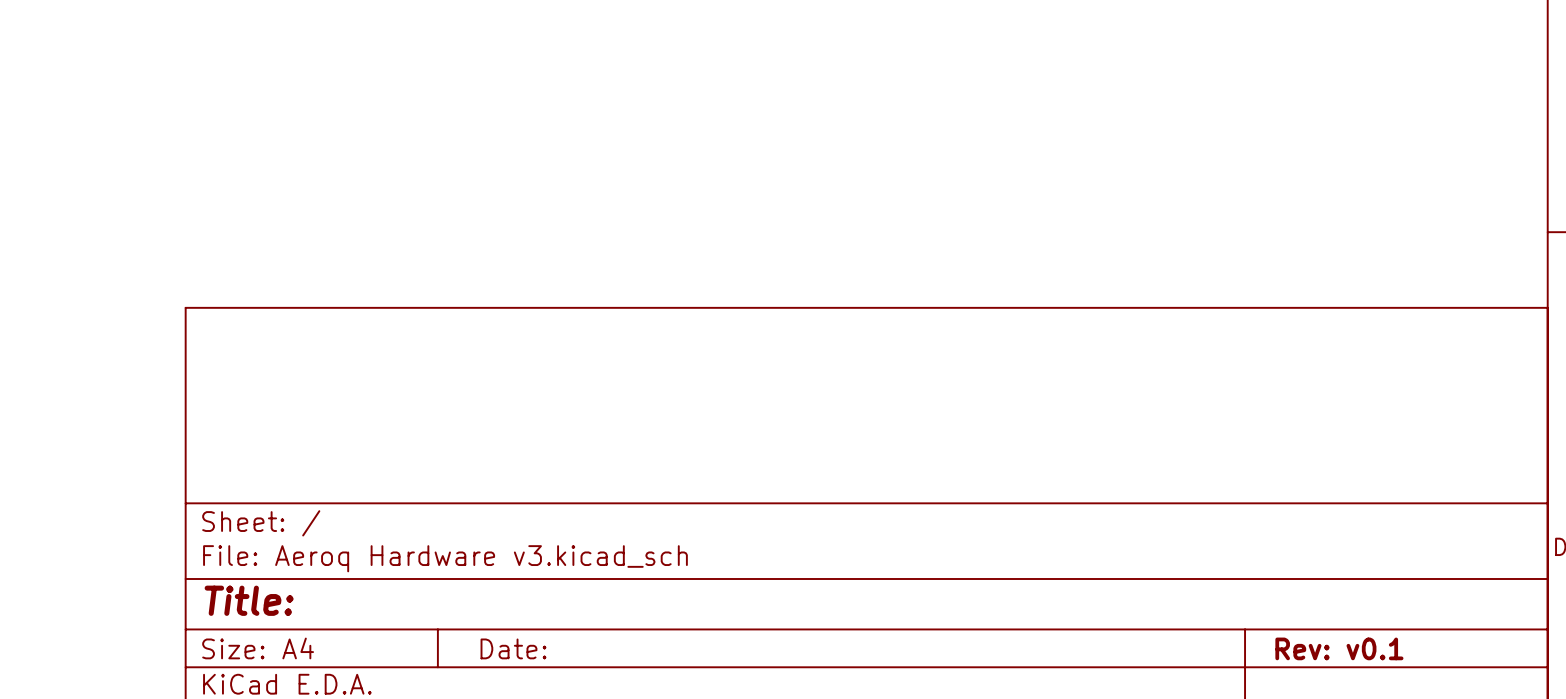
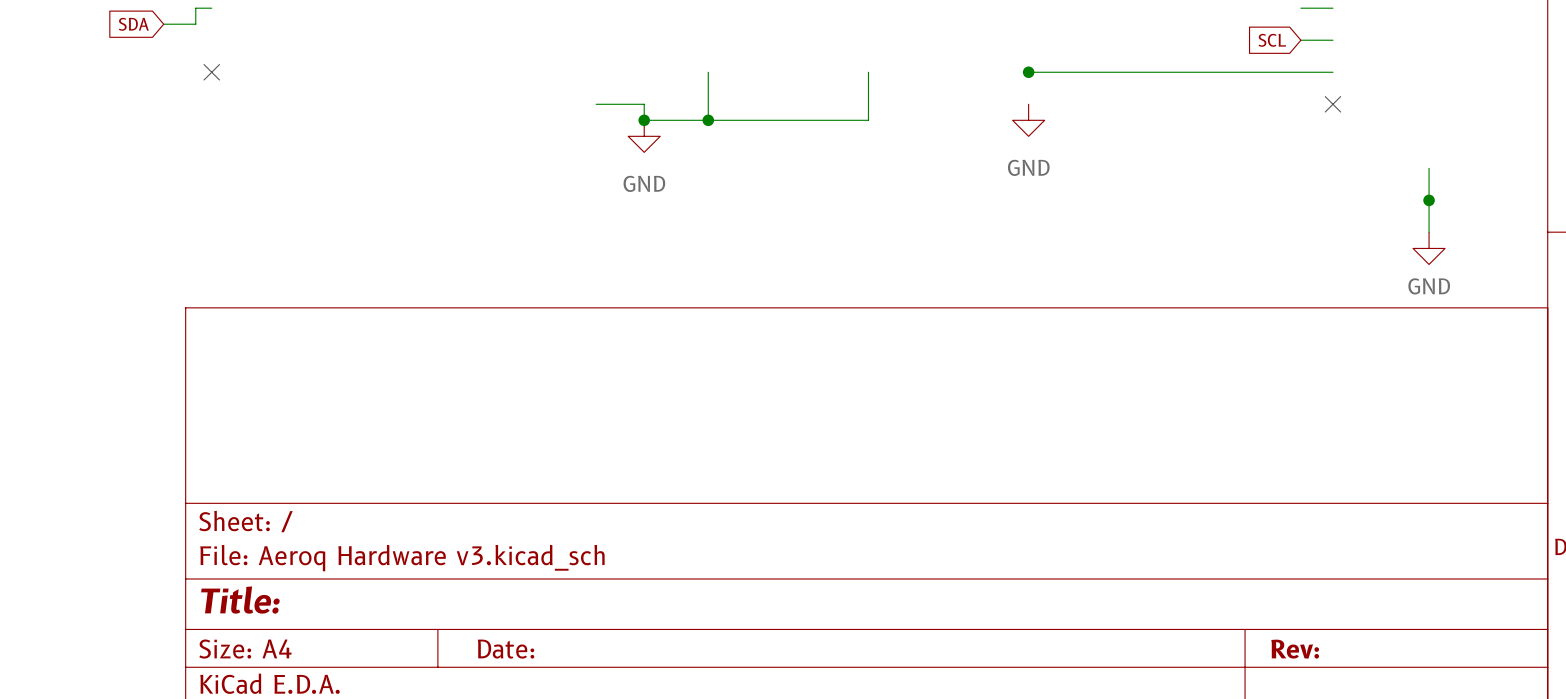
wire: none -> (211, 8) (195, 8) (195, 24) (163, 24)
wire: none -> (1300, 8) (1332, 8)
global label: none -> SDA (133, 24)
global label: none -> SCL (1272, 40)
wire: none -> (1300, 40) (1332, 40)
no-connect mark: none -> (211, 72)
wire: none -> (708, 72) (708, 120)
wire: none -> (868, 72) (868, 120) (644, 120) (644, 104) (596, 104)
wire: none -> (1028, 72) (1332, 72)
junction: none -> (1028, 72)
no-connect mark: none -> (1332, 104)
junction: none -> (644, 120)
junction: none -> (708, 120)
power symbol: none -> GND (1028, 120)
power symbol: none -> GND (644, 136)
wire: none -> (1429, 168) (1429, 232)
junction: none -> (1429, 200)
power symbol: none -> GND (1429, 248)
title block: Rev: v0.1 (1339, 648) -> Rev: (1295, 649)

